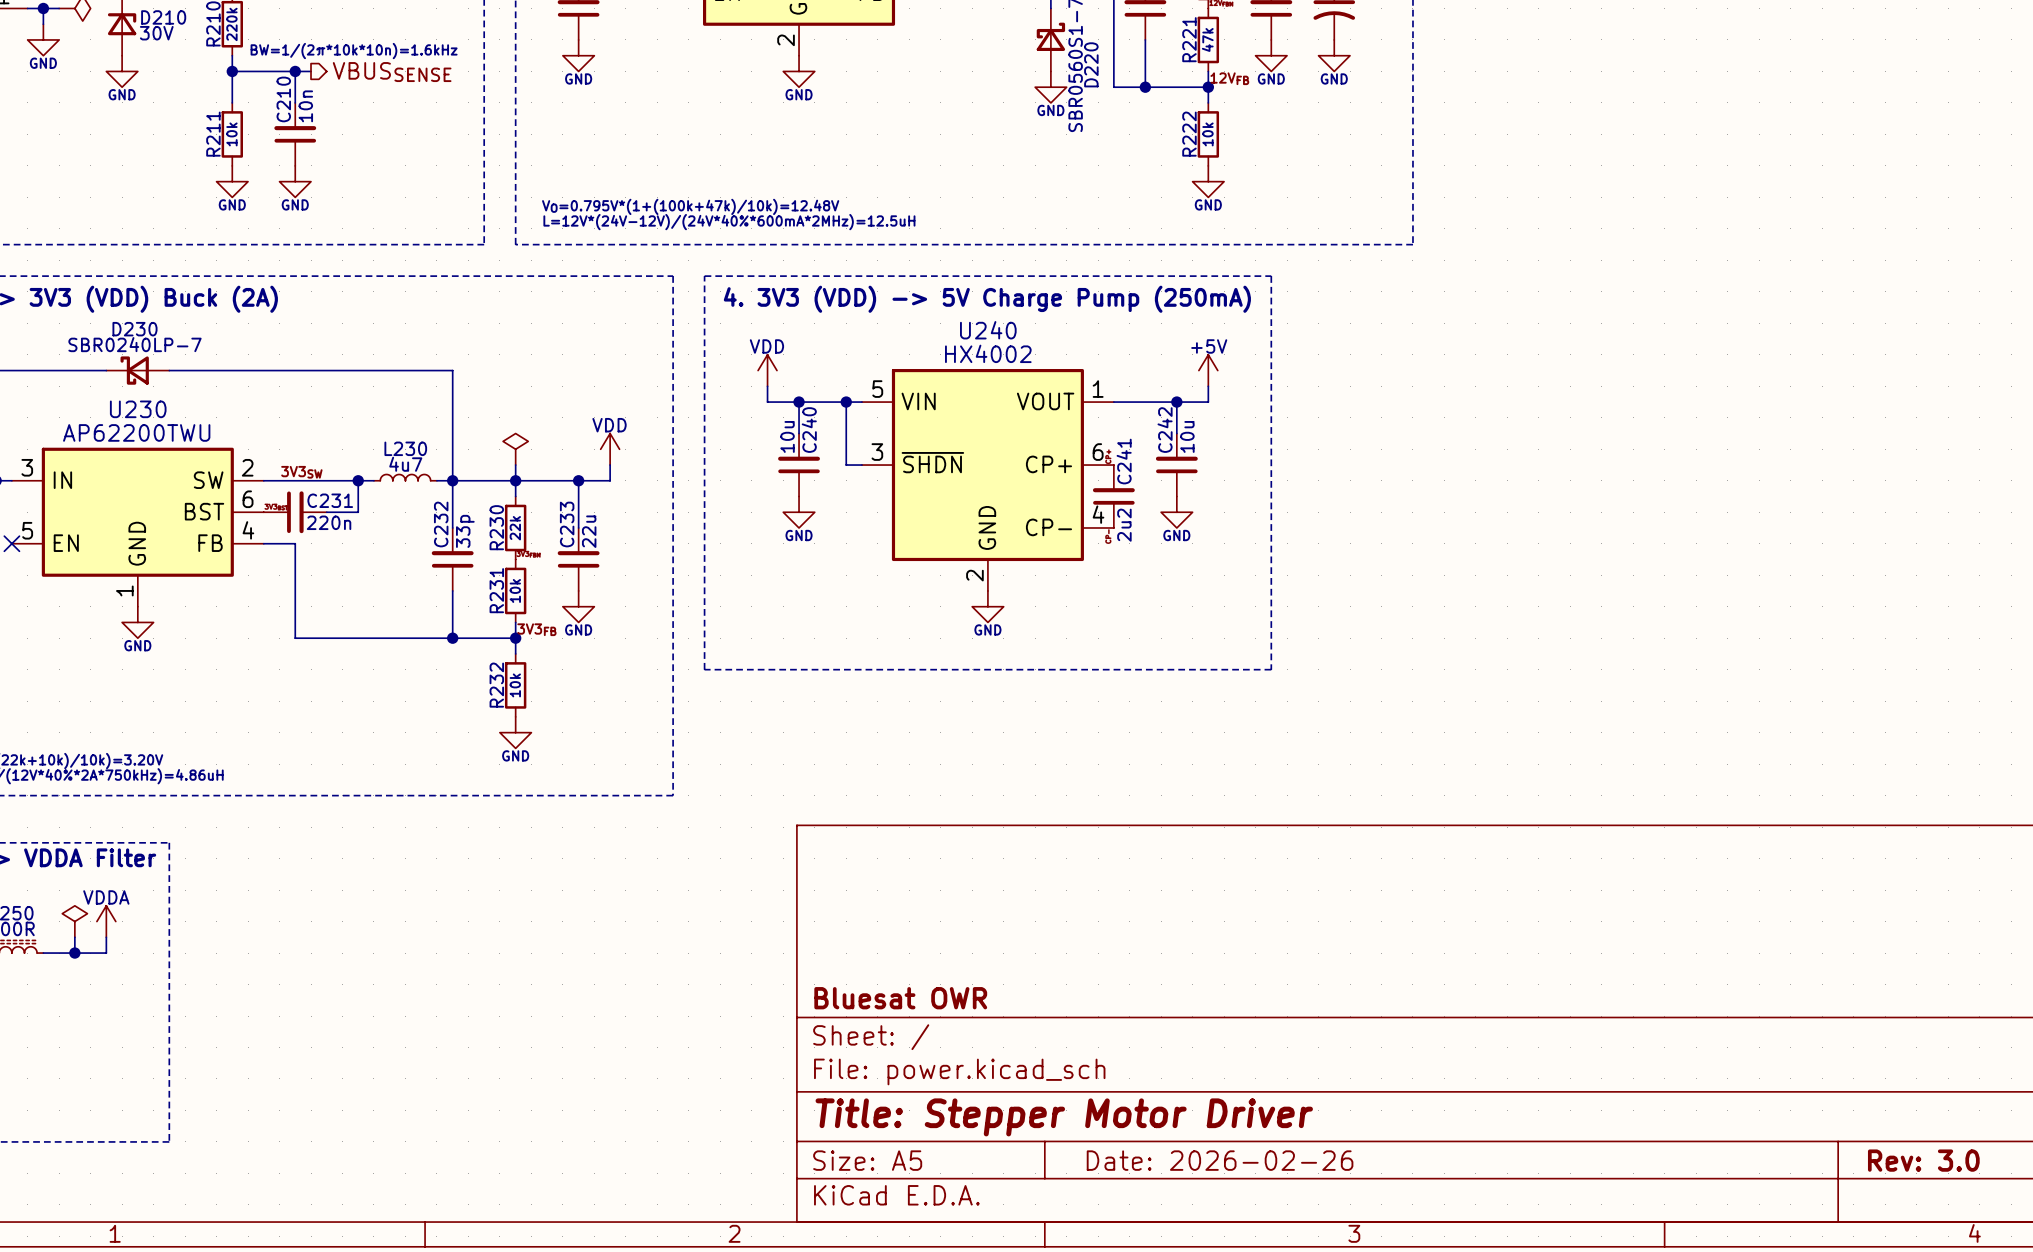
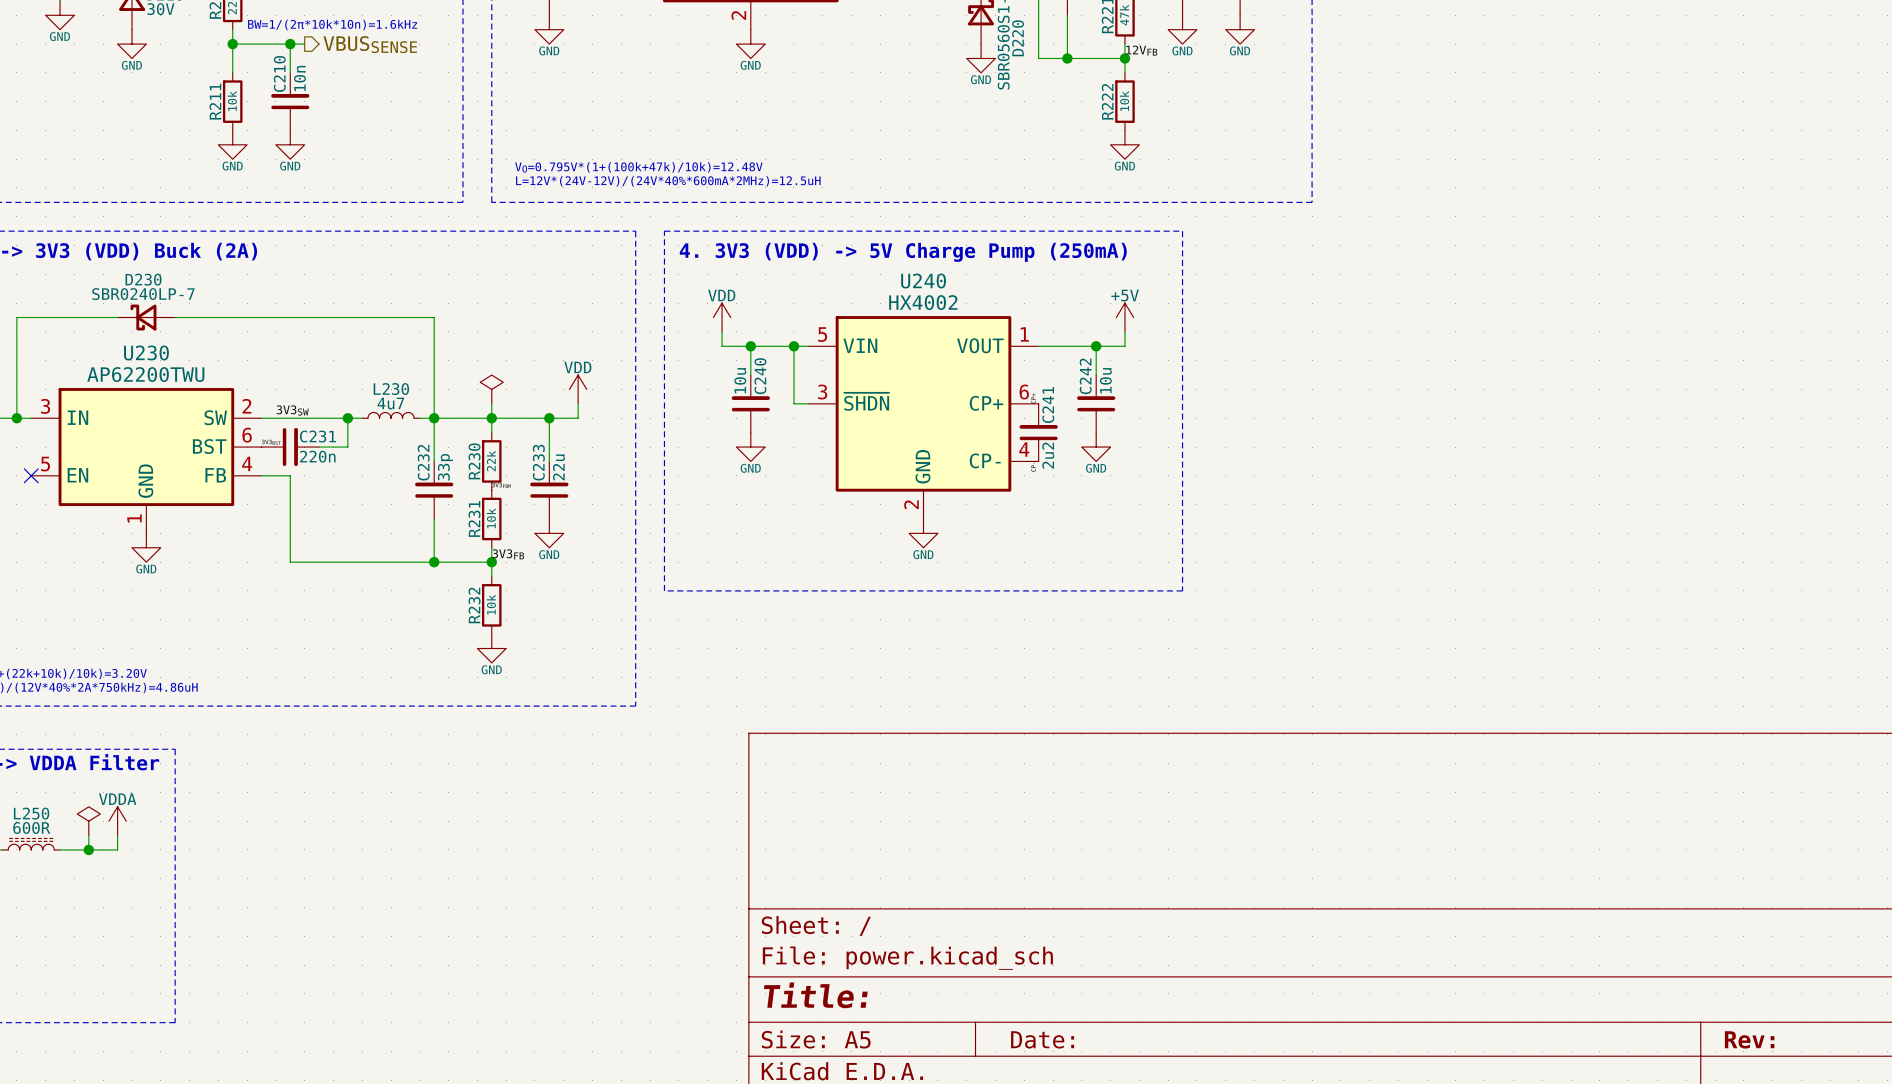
title block: Bluesat OWR (900, 998) -> none
title block: Title: Stepper Motor Driver (1064, 1117) -> Title: (815, 995)
title block: Date: 2026-02-26 (1220, 1160) -> Date: (1042, 1039)
title block: Rev: 3.0 (1923, 1160) -> Rev: (1749, 1039)

